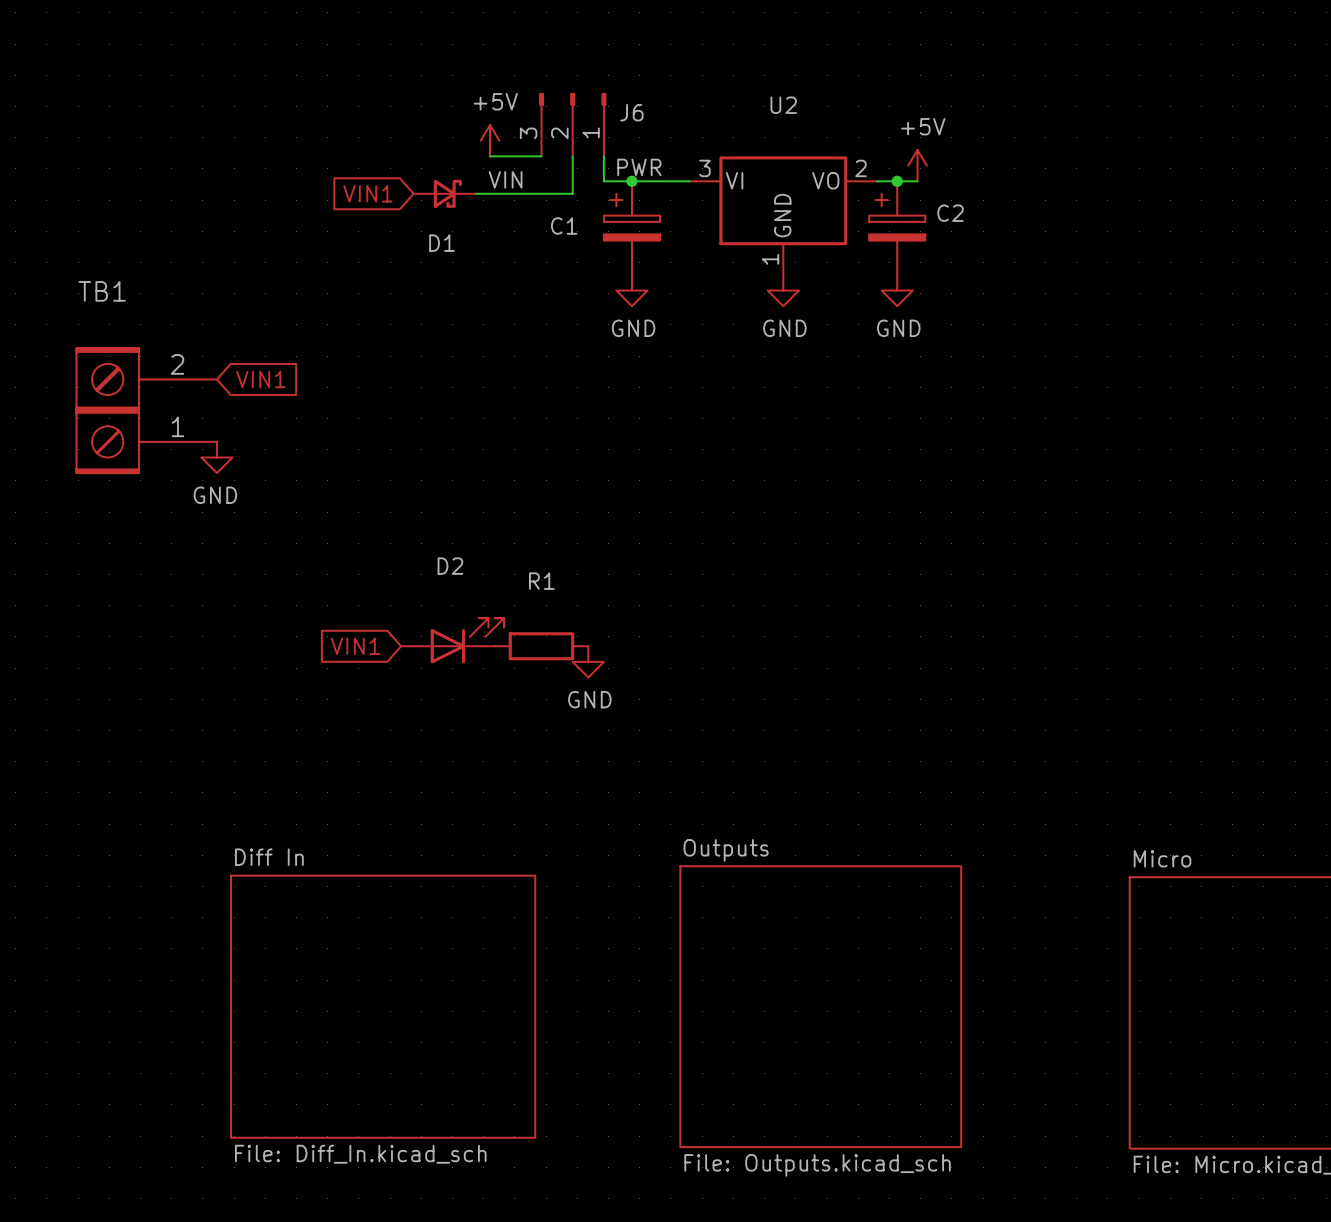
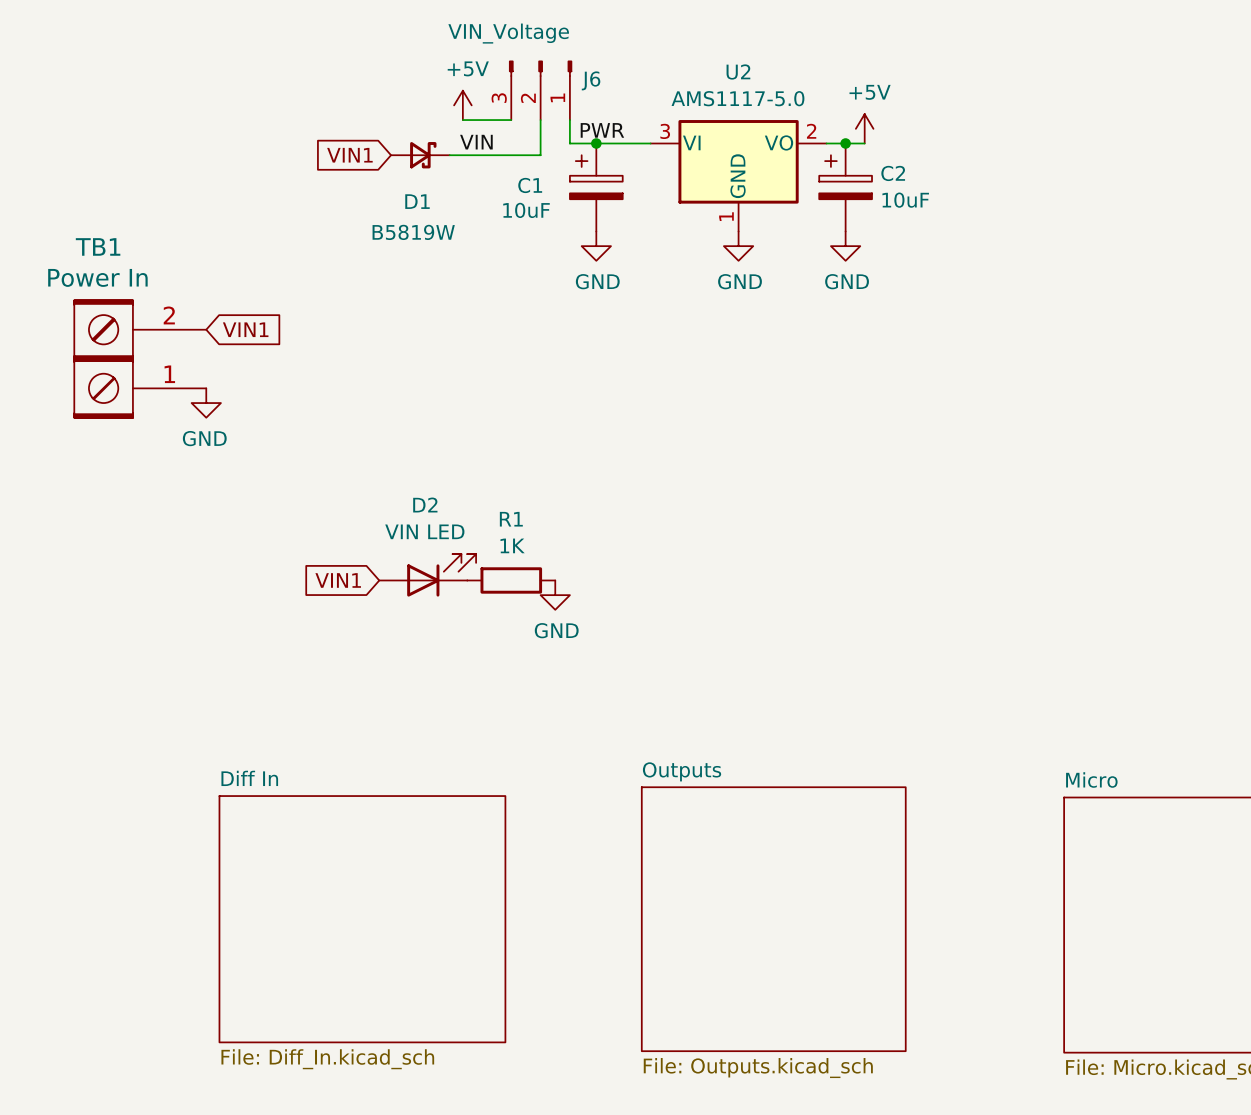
J6 value: none -> VIN_Voltage (508, 33)
U2 value: none -> AMS1117-5.0 (737, 98)
C2 value: none -> 10uF (905, 200)
C1 value: none -> 10uF (526, 210)
D1 value: none -> B5819W (413, 232)
TB1 value: none -> Power In (97, 277)
D2 value: none -> VIN LED (424, 531)
R1 value: none -> 1K (512, 545)

